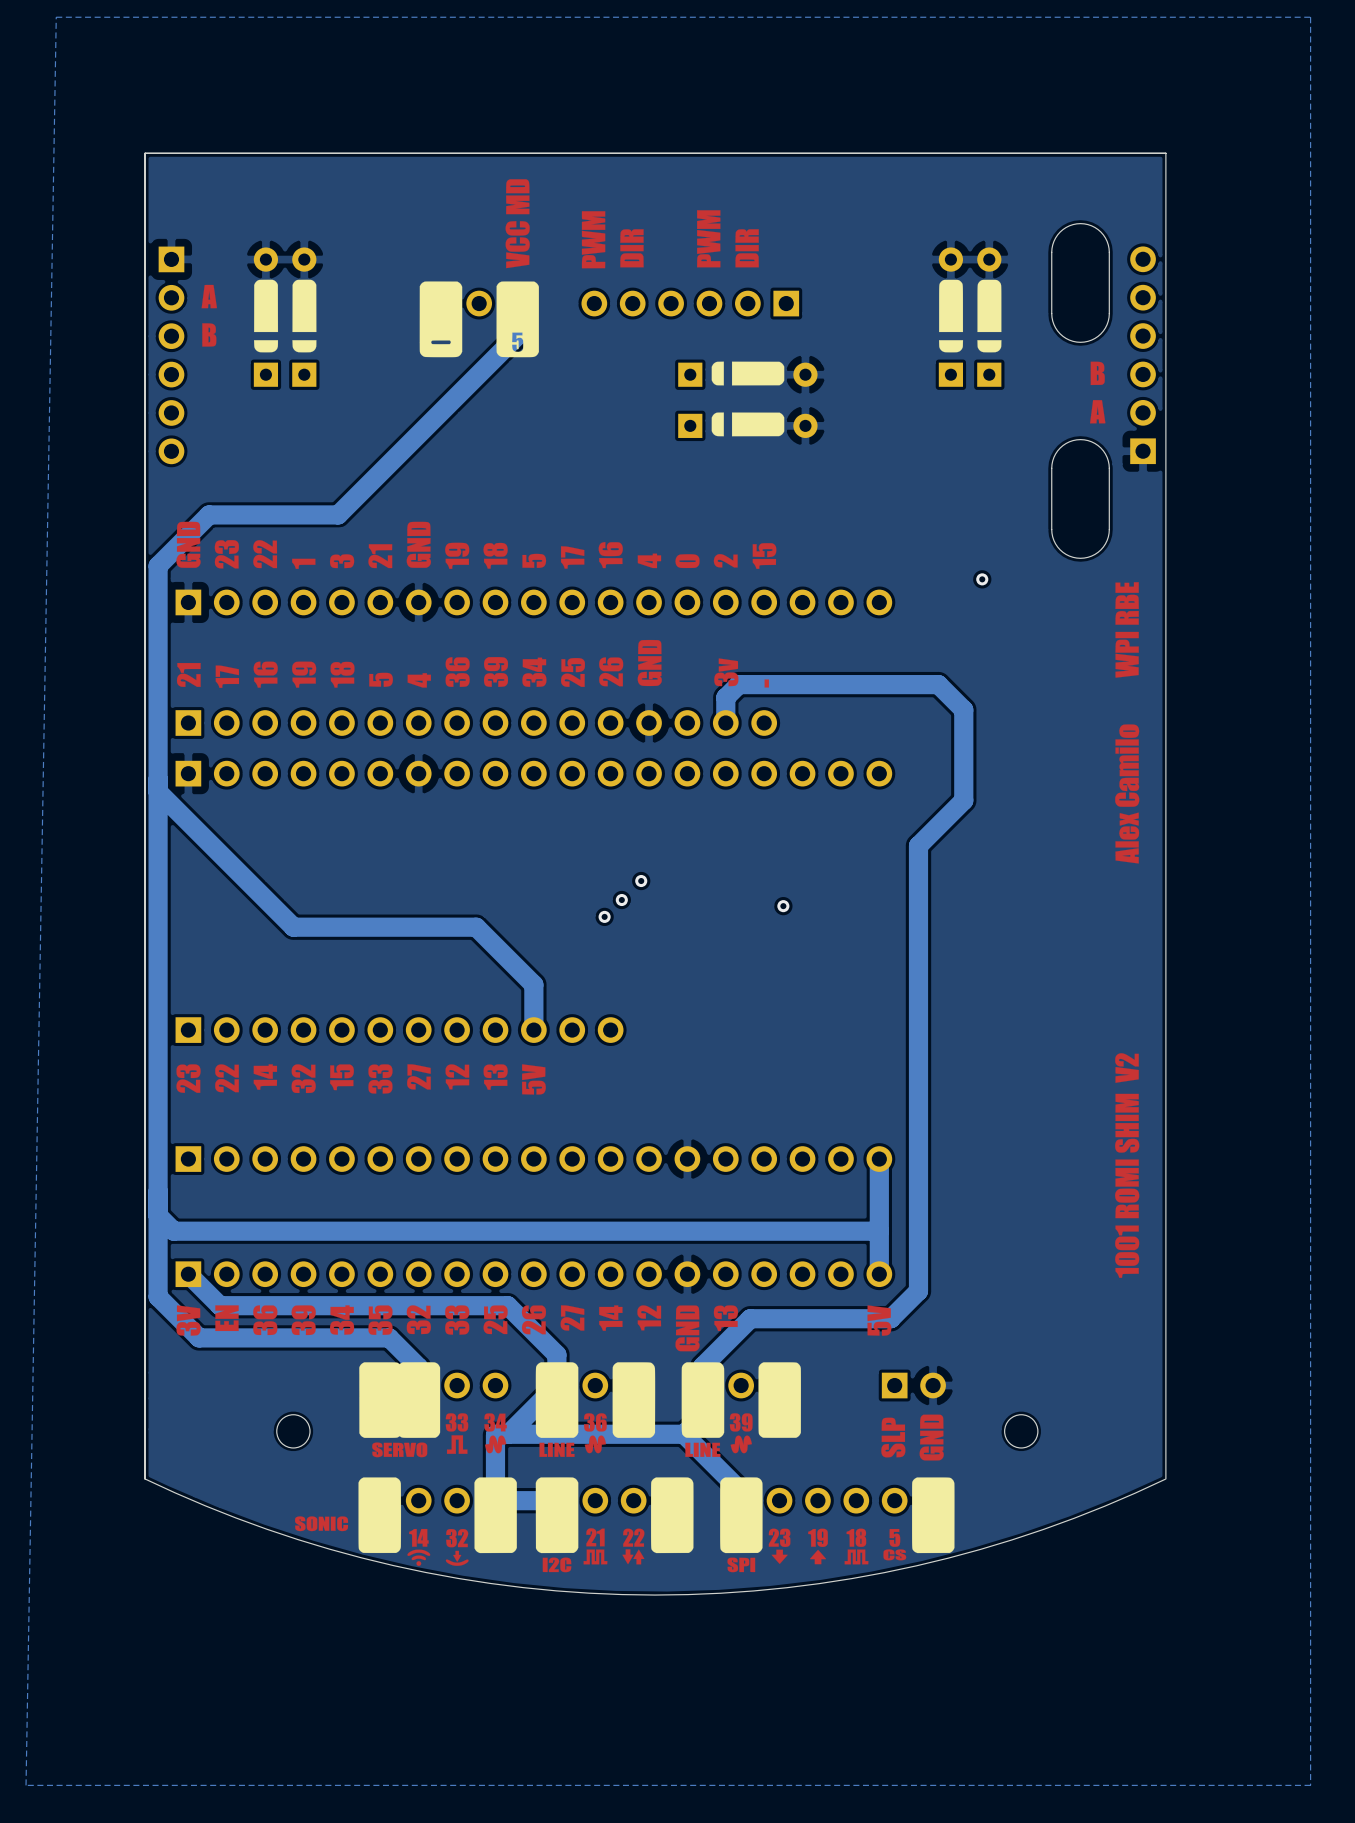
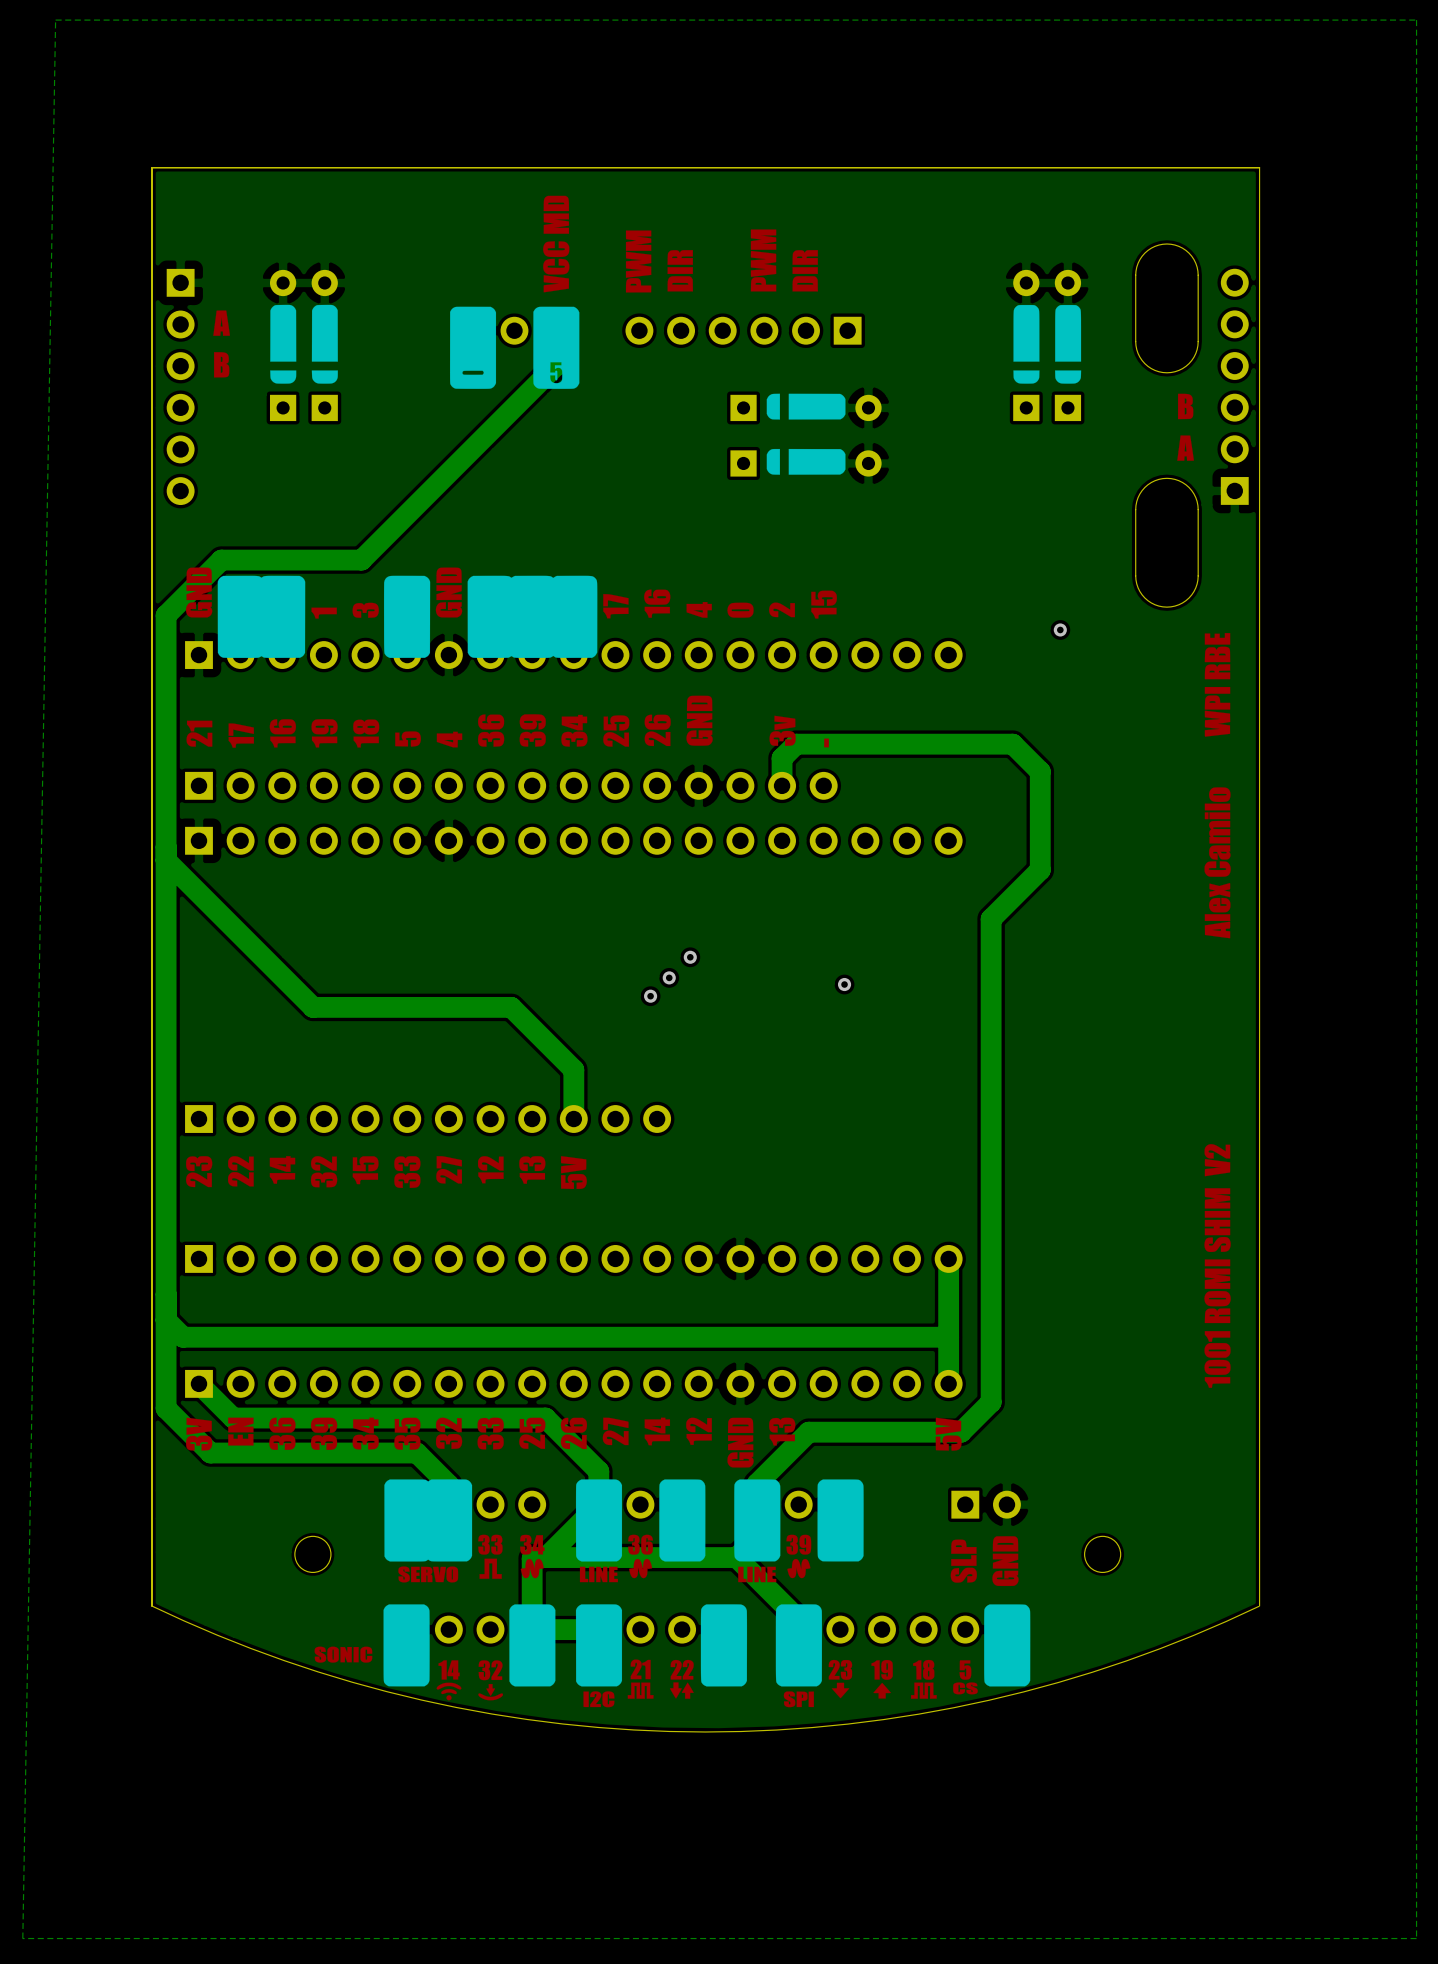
drawing shape: [176, 179, 1140, 1573] -> [185, 195, 1231, 1708]

